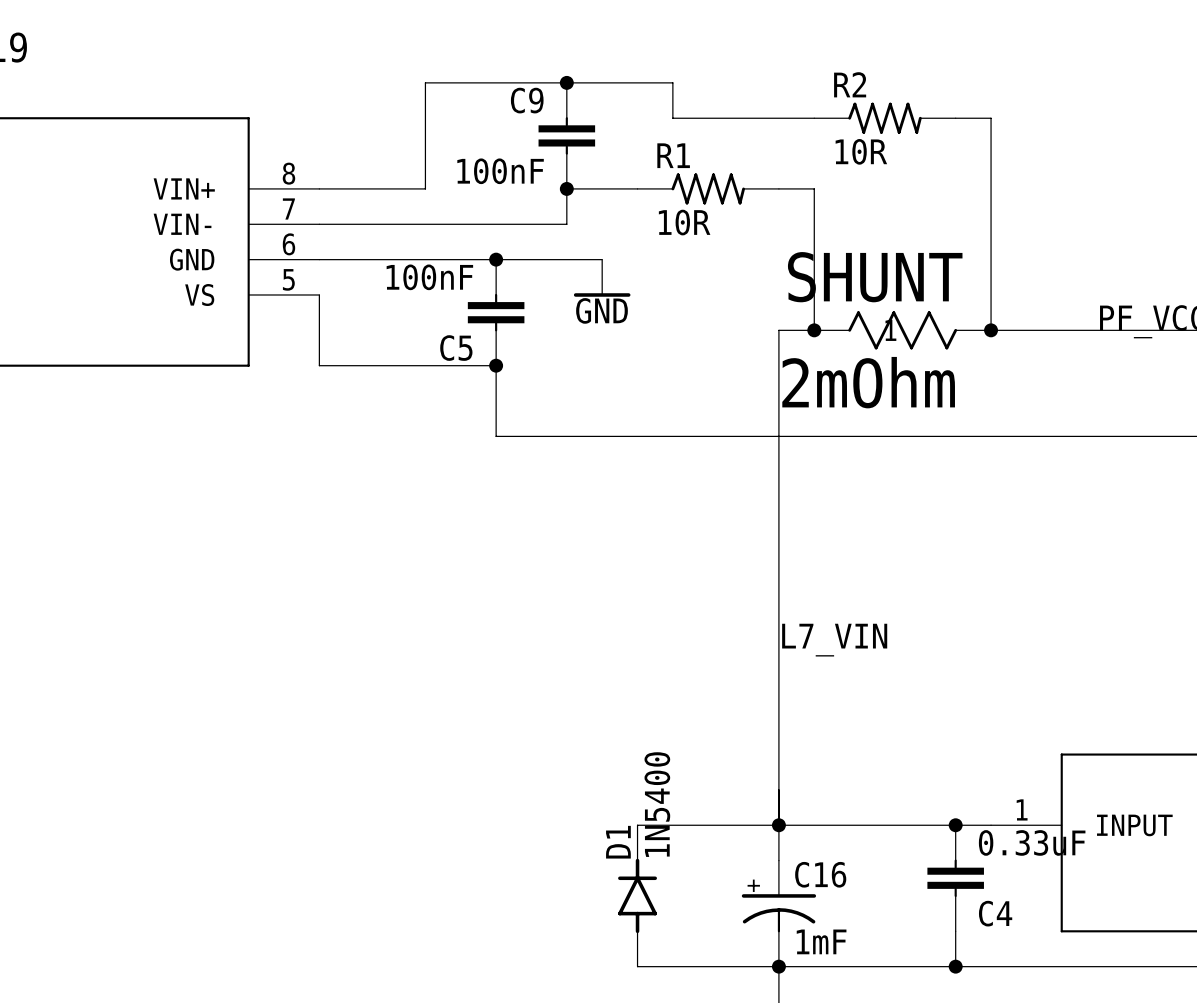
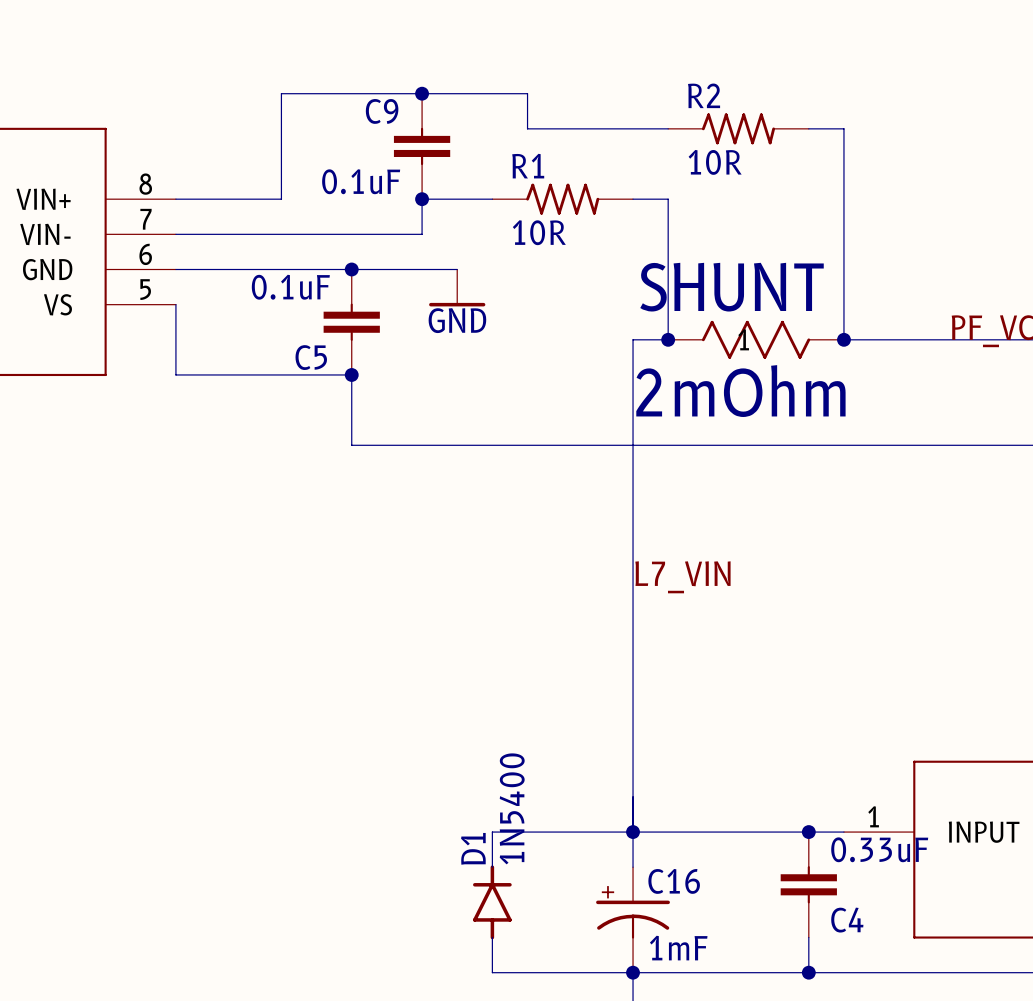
C9 value: 100nF (500, 171) -> 0.1uF (361, 181)
C5 value: 100nF (429, 277) -> 0.1uF (290, 287)
label position: L7_VIN (834, 640) -> L7_VIN (682, 577)

